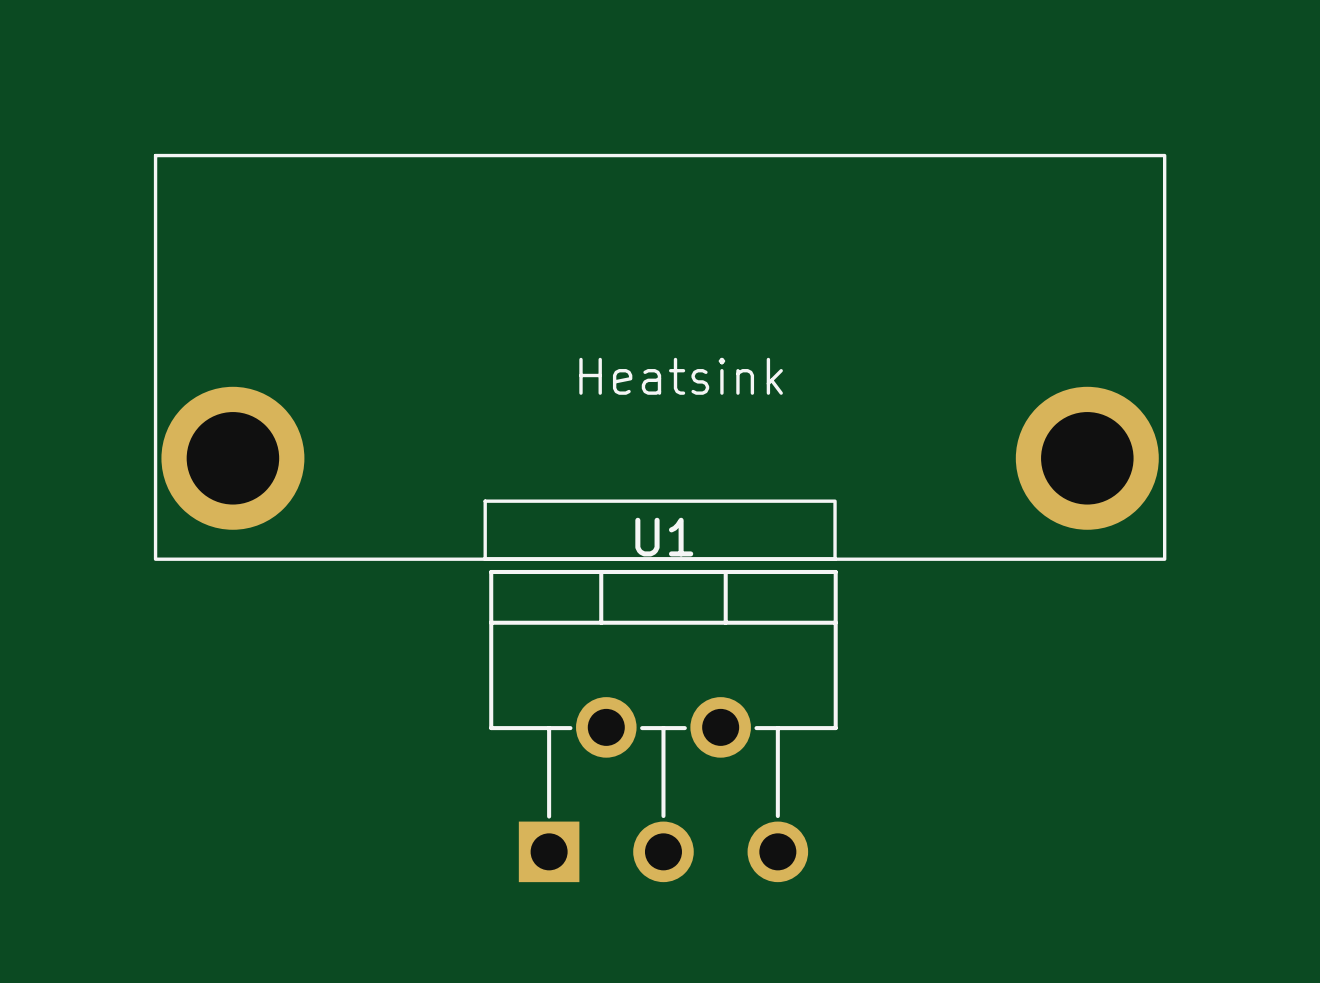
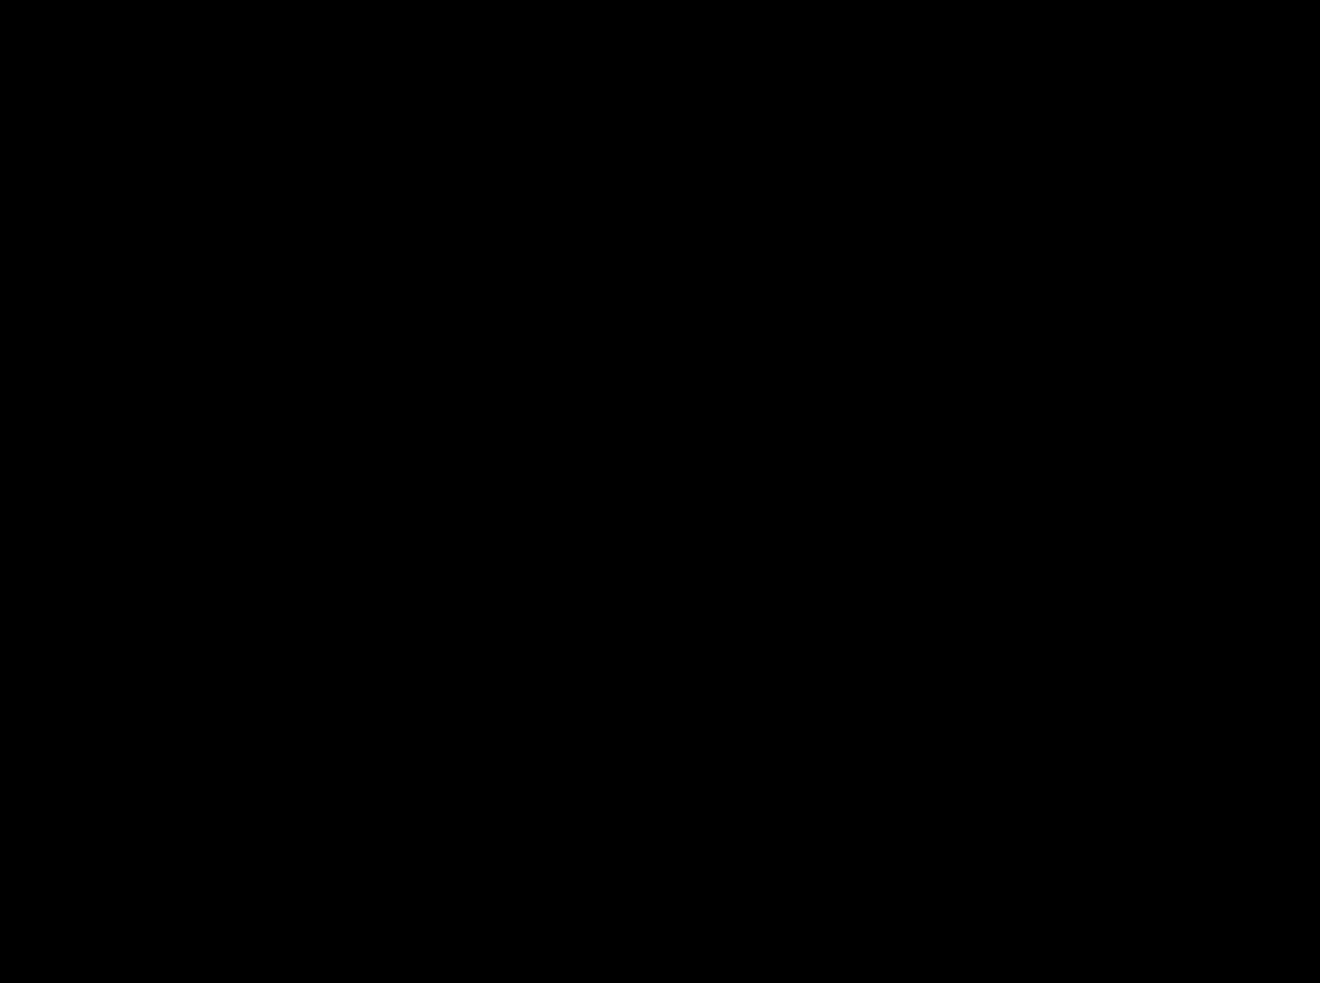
Heatsink: (660, 357) -> none
U1: (663, 726) -> none

